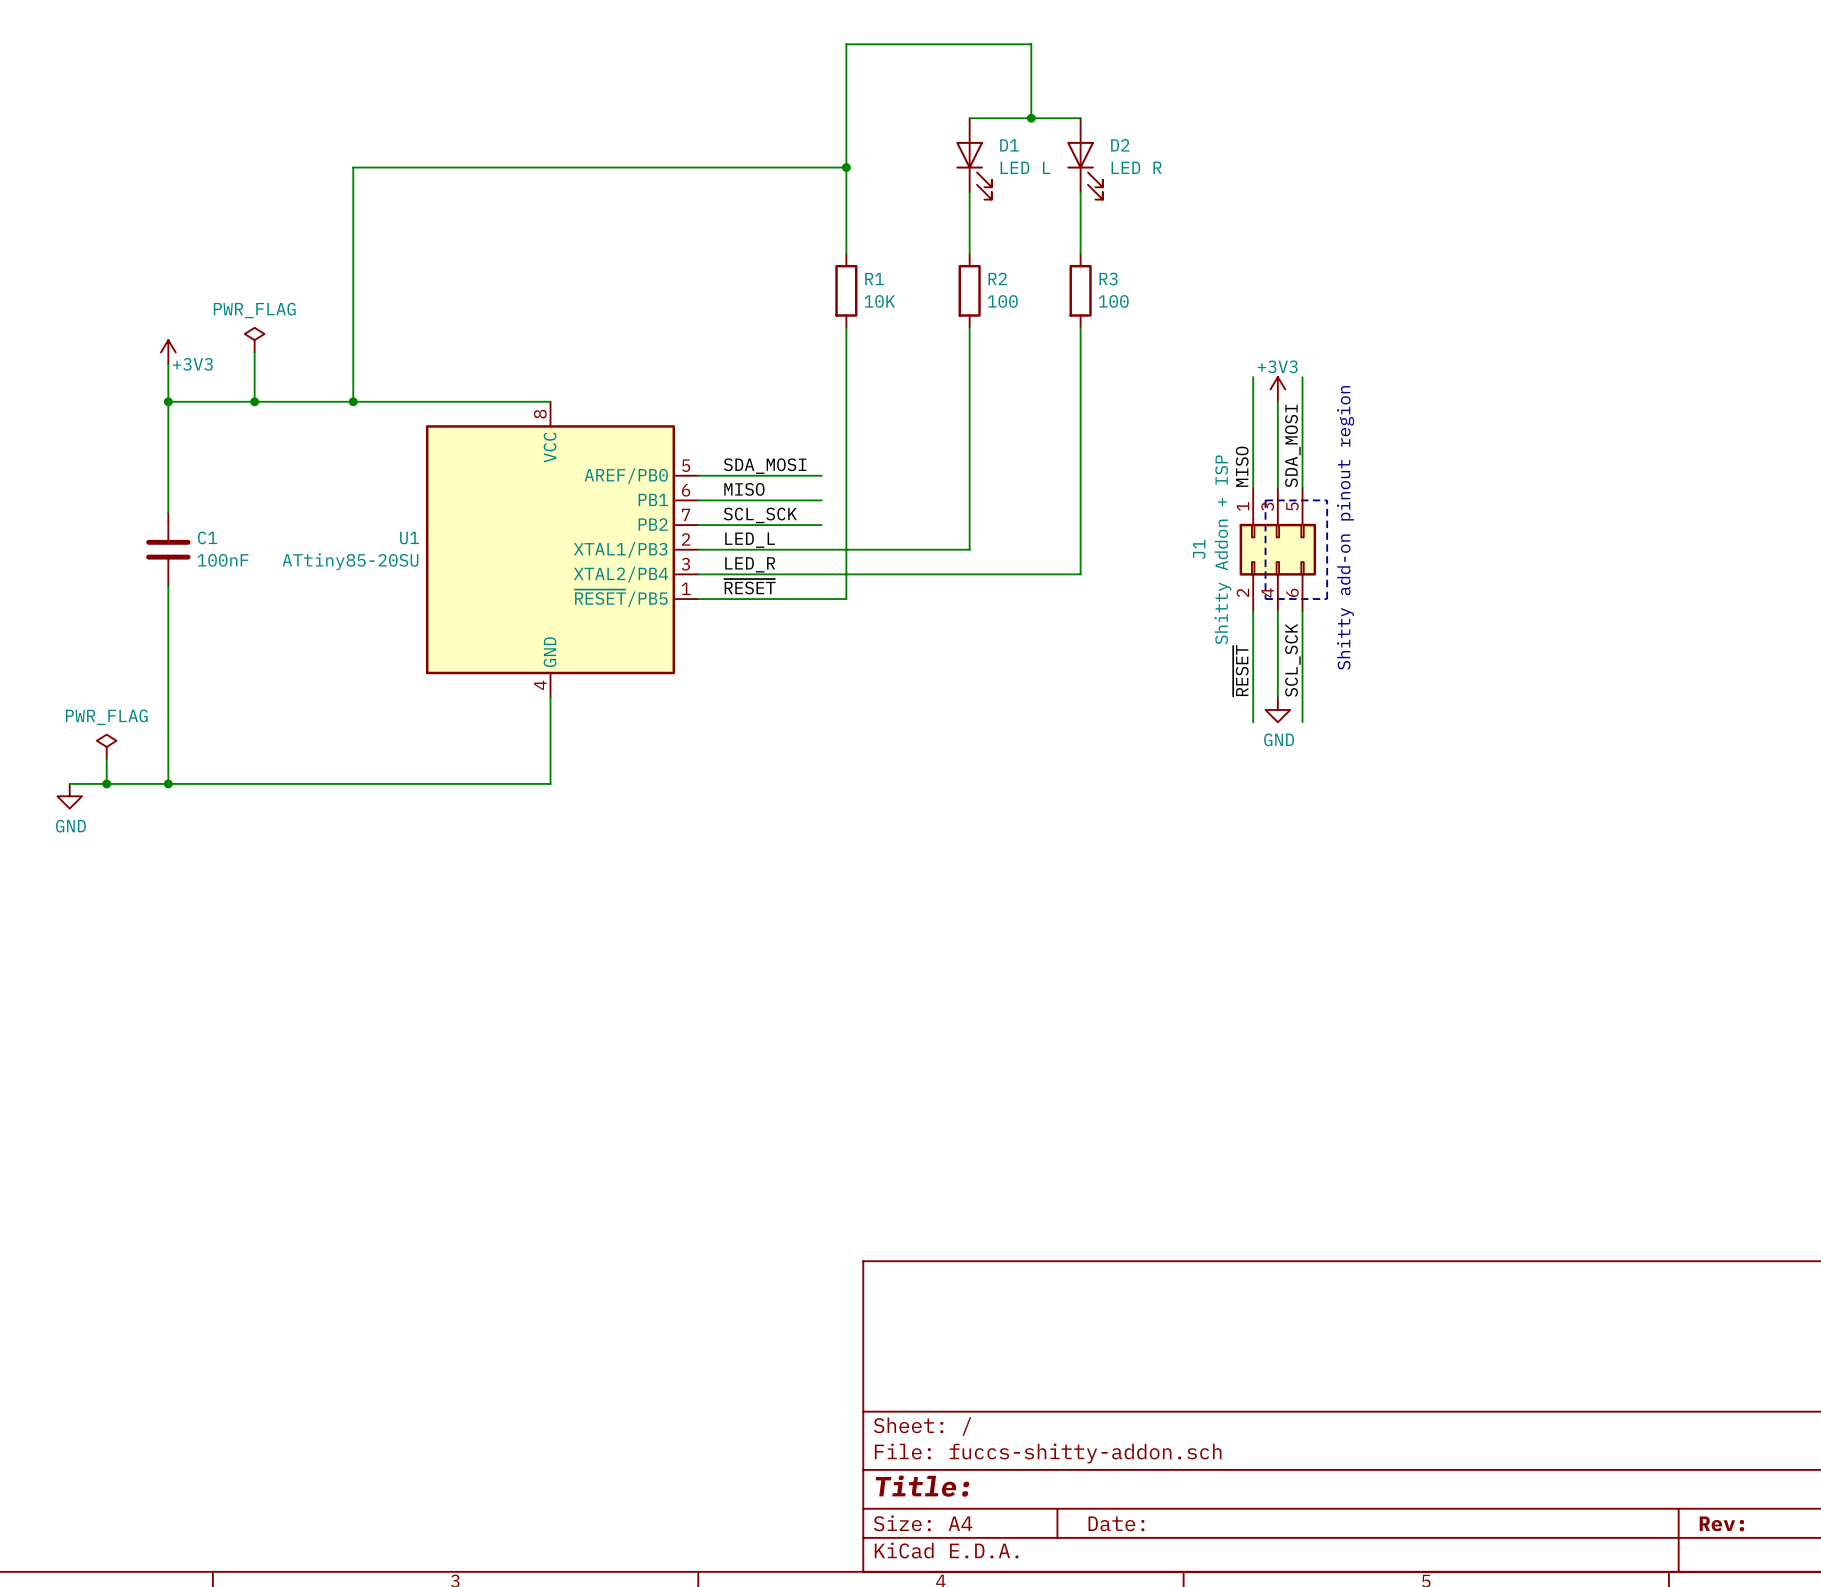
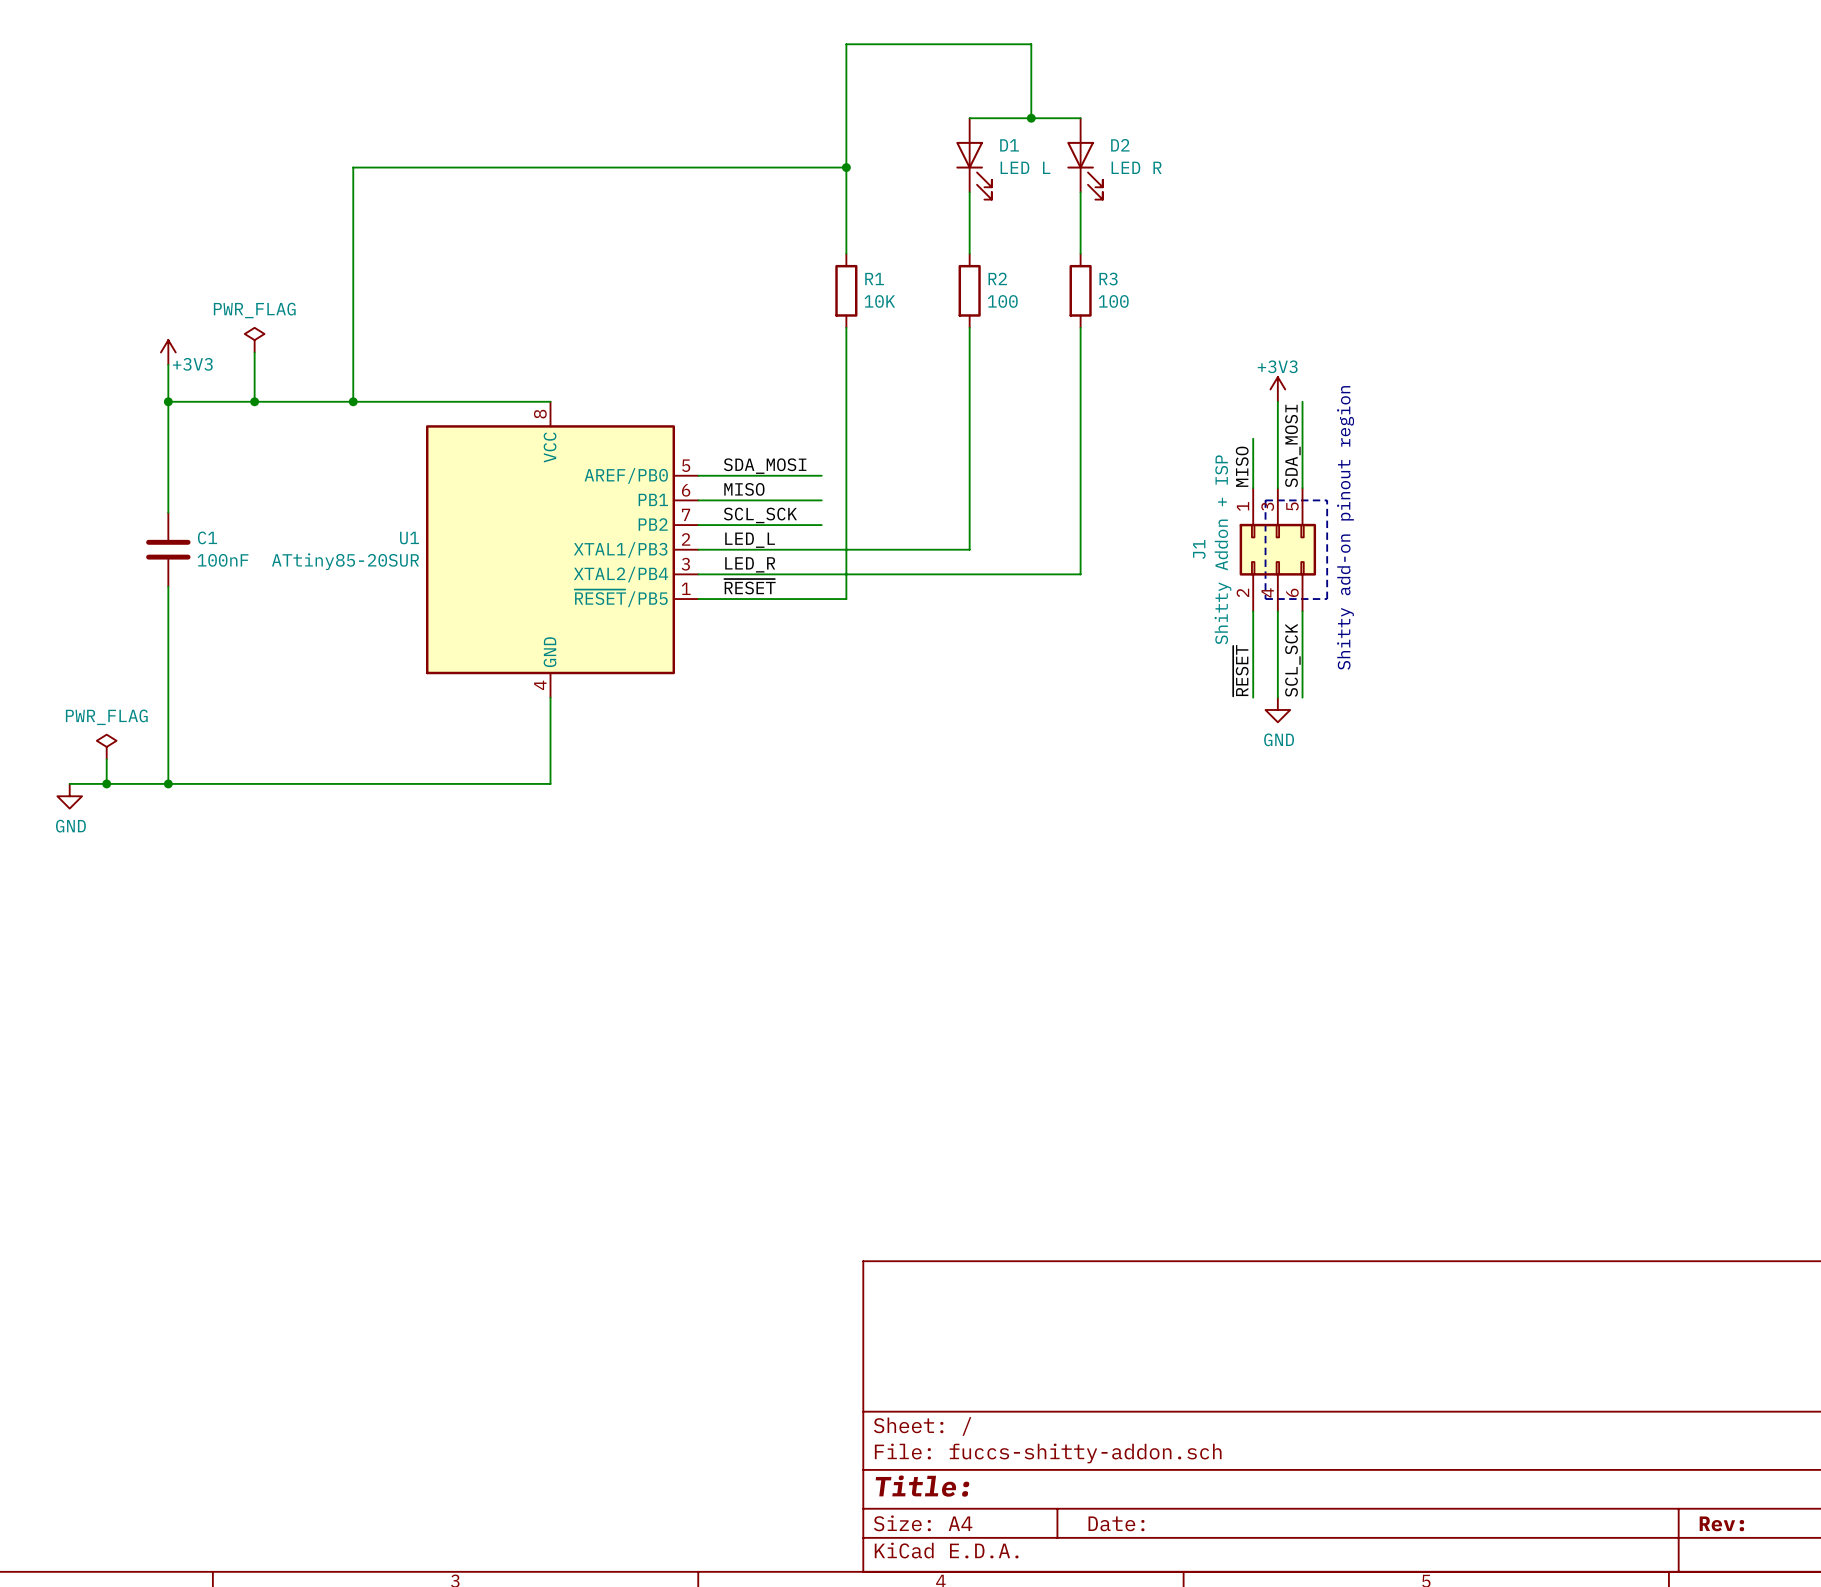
wire: (1253, 377) (1253, 438) -> none
wire: (1302, 377) (1302, 401) -> none
U1 value: ATtiny85-20SU (350, 561) -> ATtiny85-20SUR (345, 561)
wire: (1253, 697) (1253, 722) -> none
wire: (1302, 697) (1302, 722) -> none

